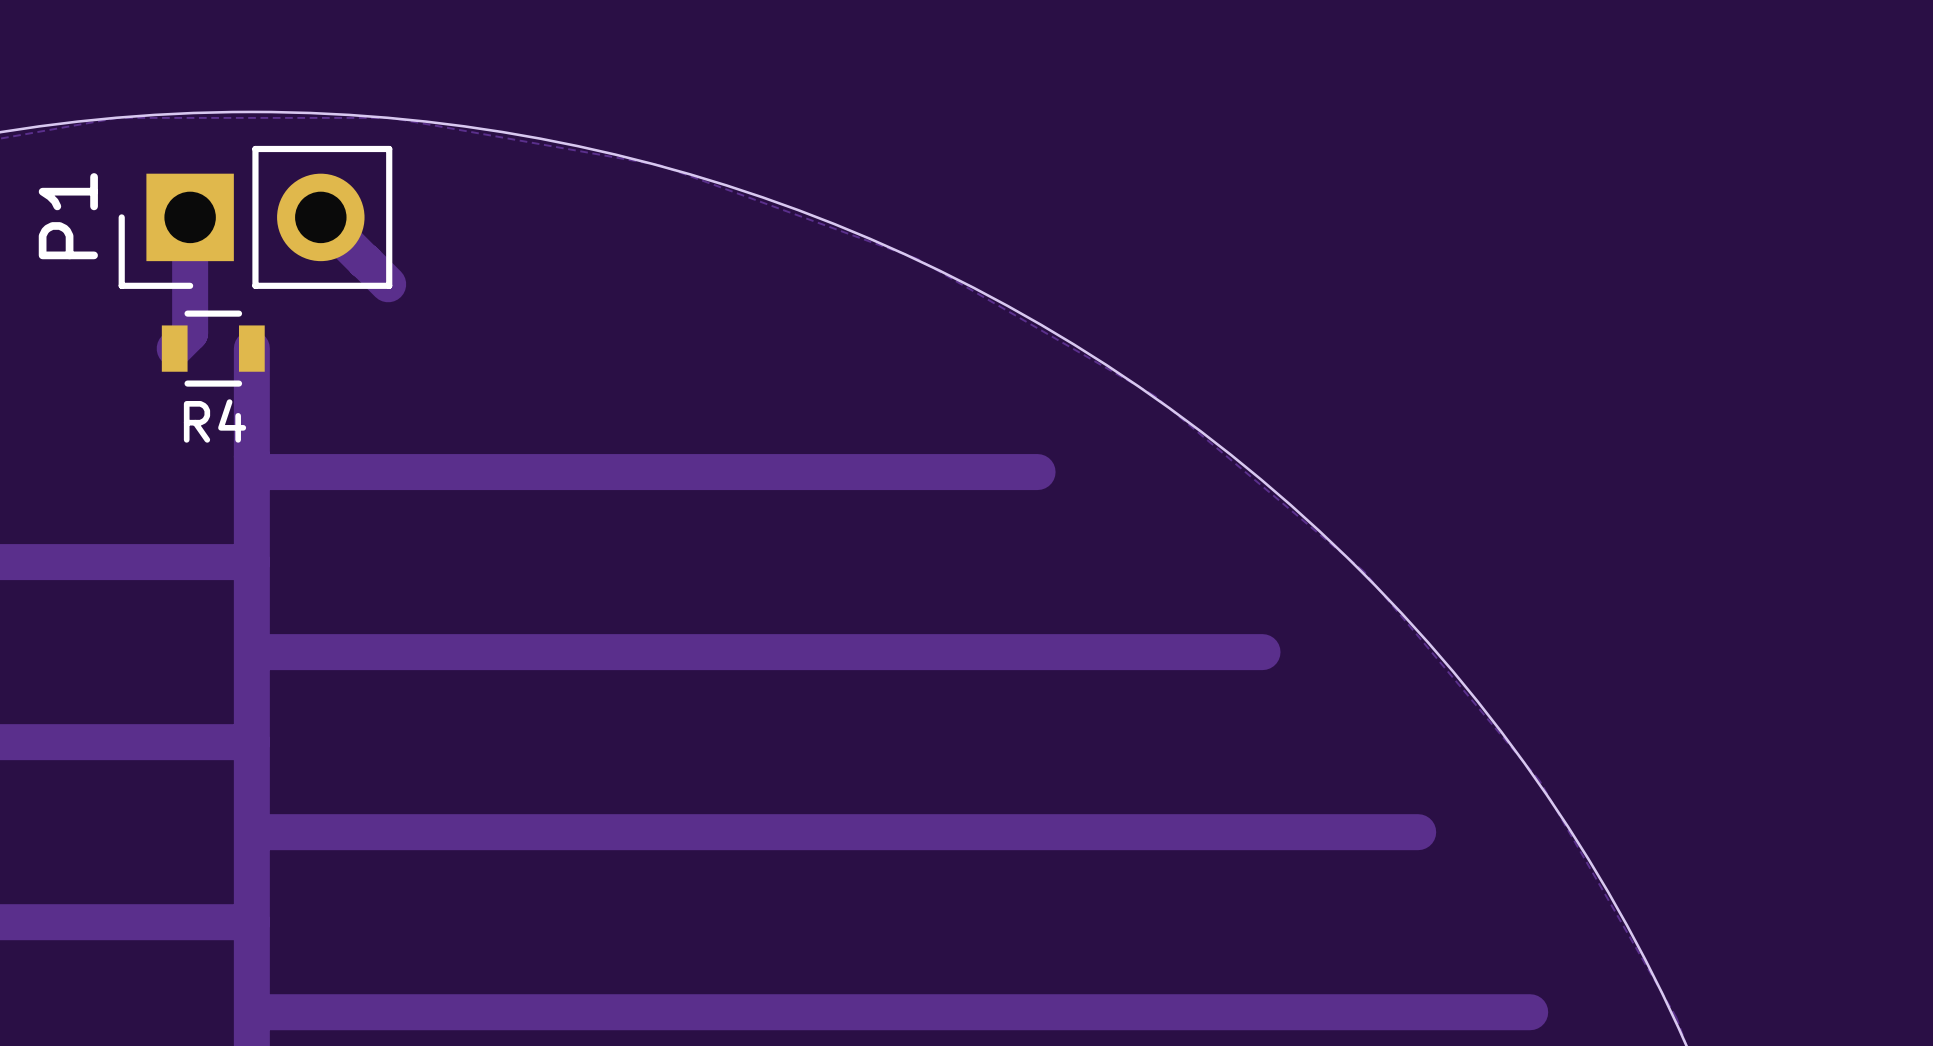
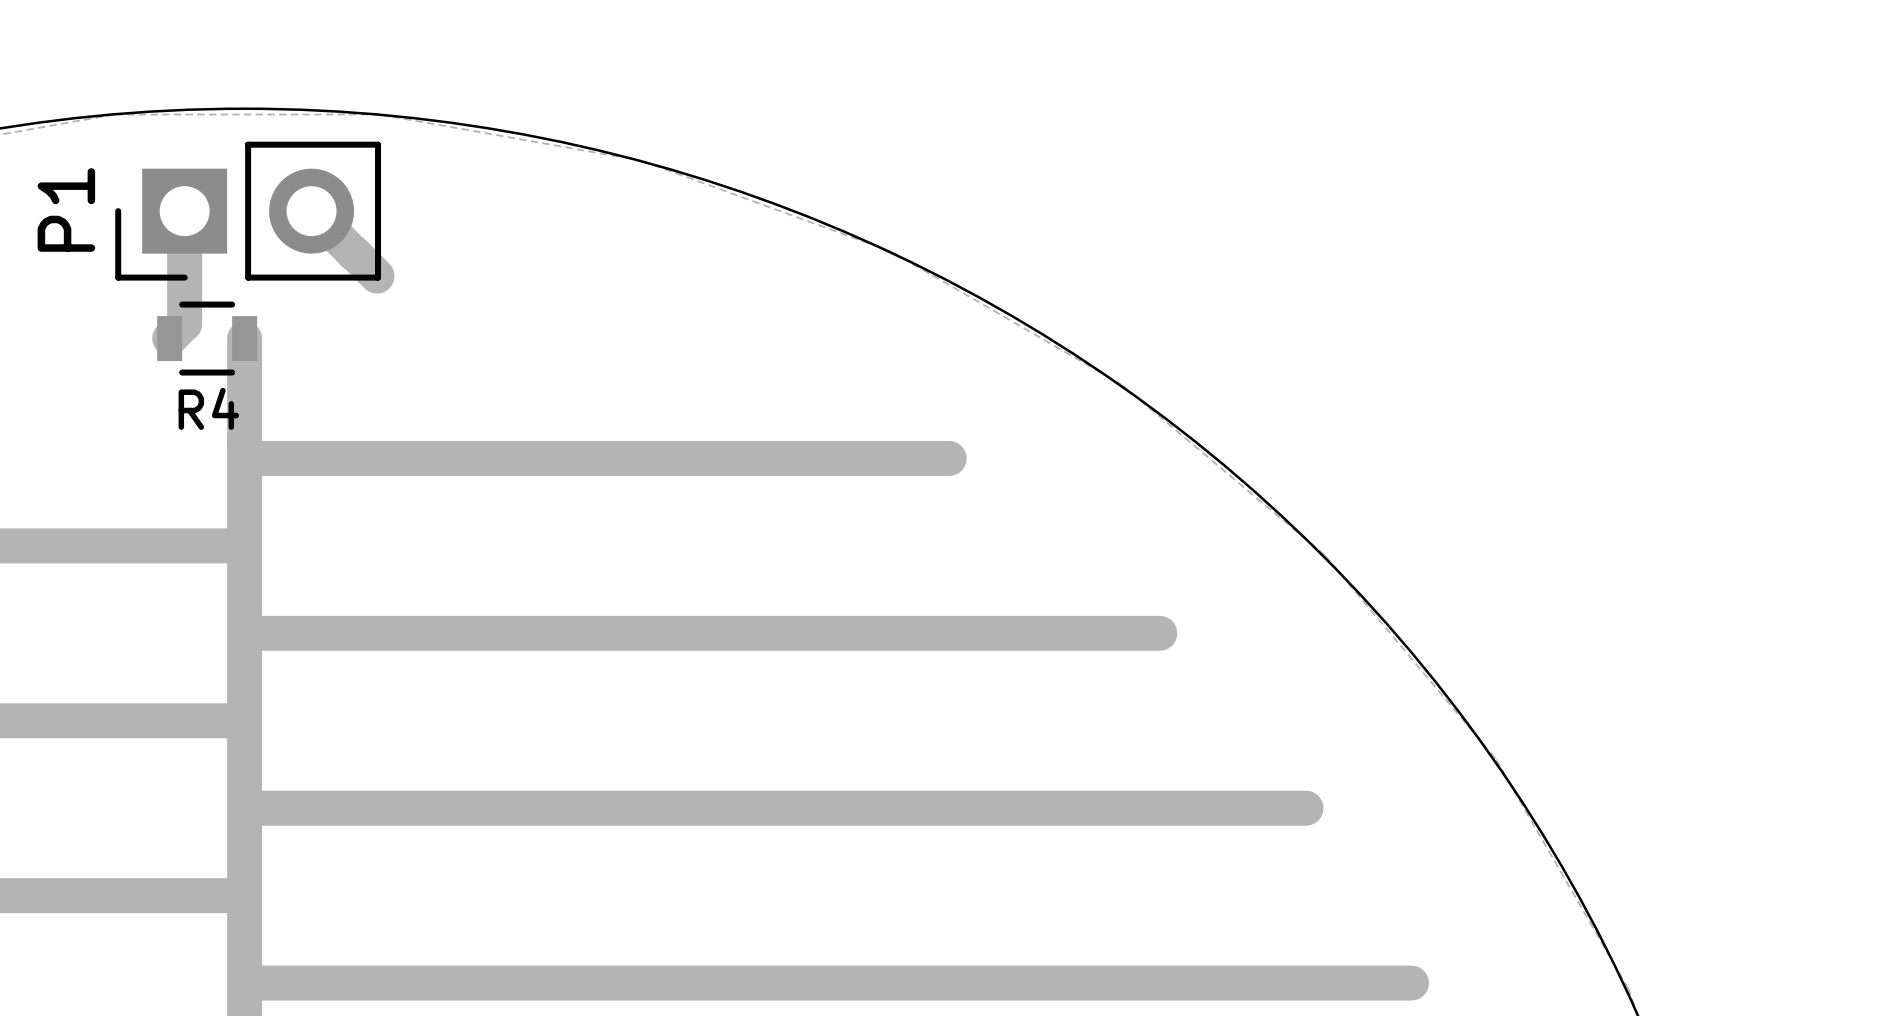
track: (977, 472) (1037, 472) -> none
track: (1194, 652) (1262, 652) -> none
track: (1344, 832) (1418, 832) -> none
track: (1453, 1012) (1530, 1012) -> none

